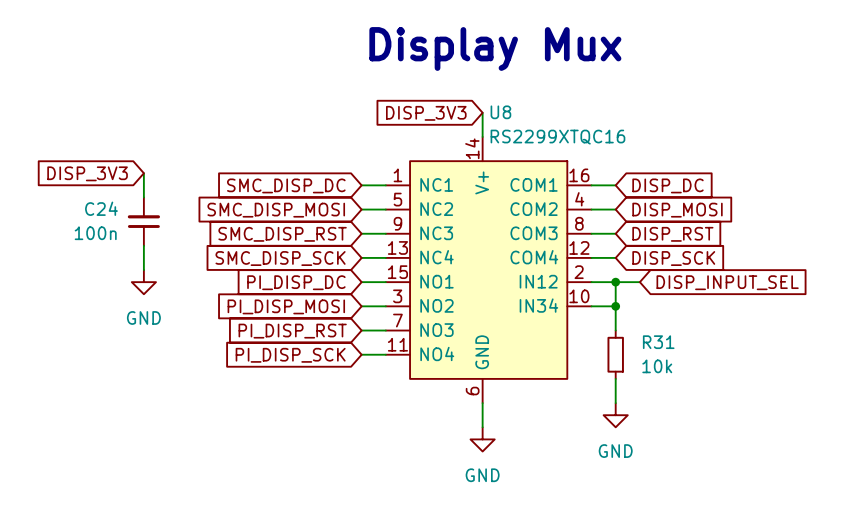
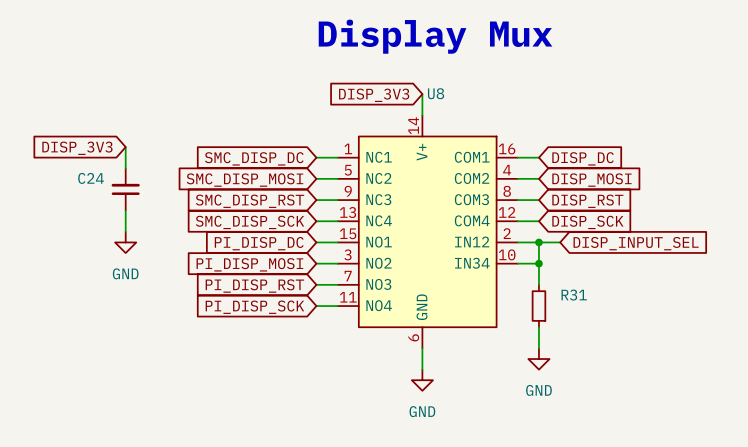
U8 value: RS2299XTQC16 (557, 137) -> none
C24 value: 100n (95, 233) -> none
R31 value: 10k (657, 366) -> none

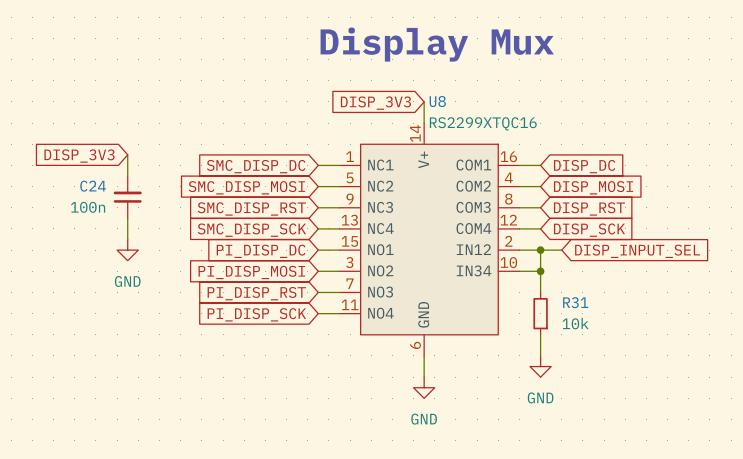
U8 value: none -> RS2299XTQC16 (483, 123)
C24 value: none -> 100n (88, 207)
R31 value: none -> 10k (575, 323)

